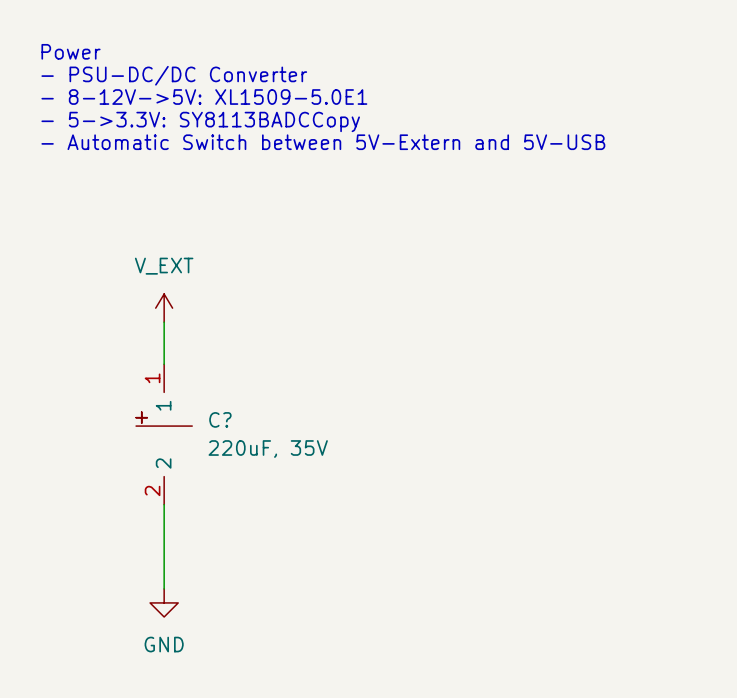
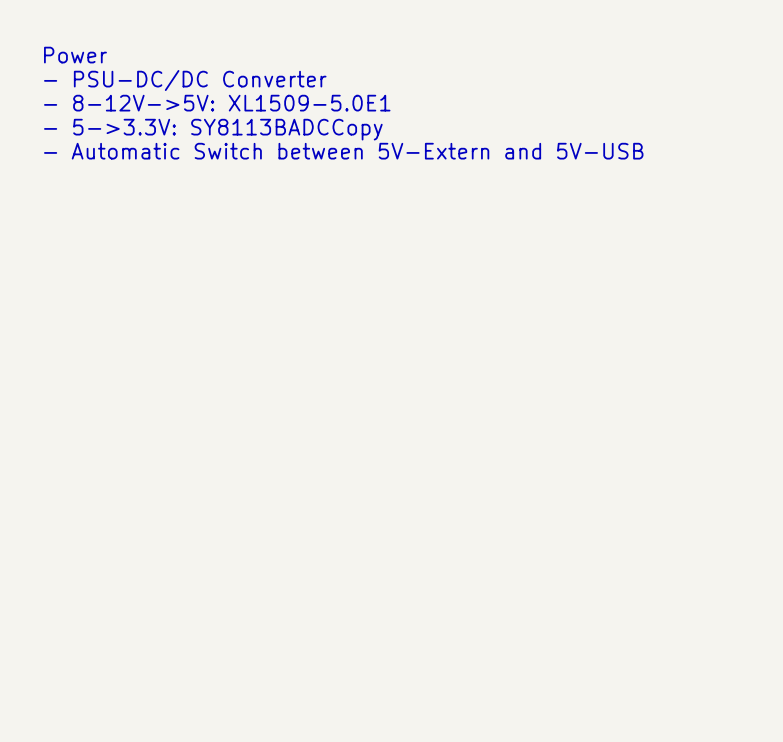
power symbol: V_EXT (164, 308) -> none
wire: (164, 322) (164, 364) -> none
C?: 220uF, 35V (164, 434) -> none
wire: (164, 504) (164, 588) -> none
power symbol: GND (164, 602) -> none

